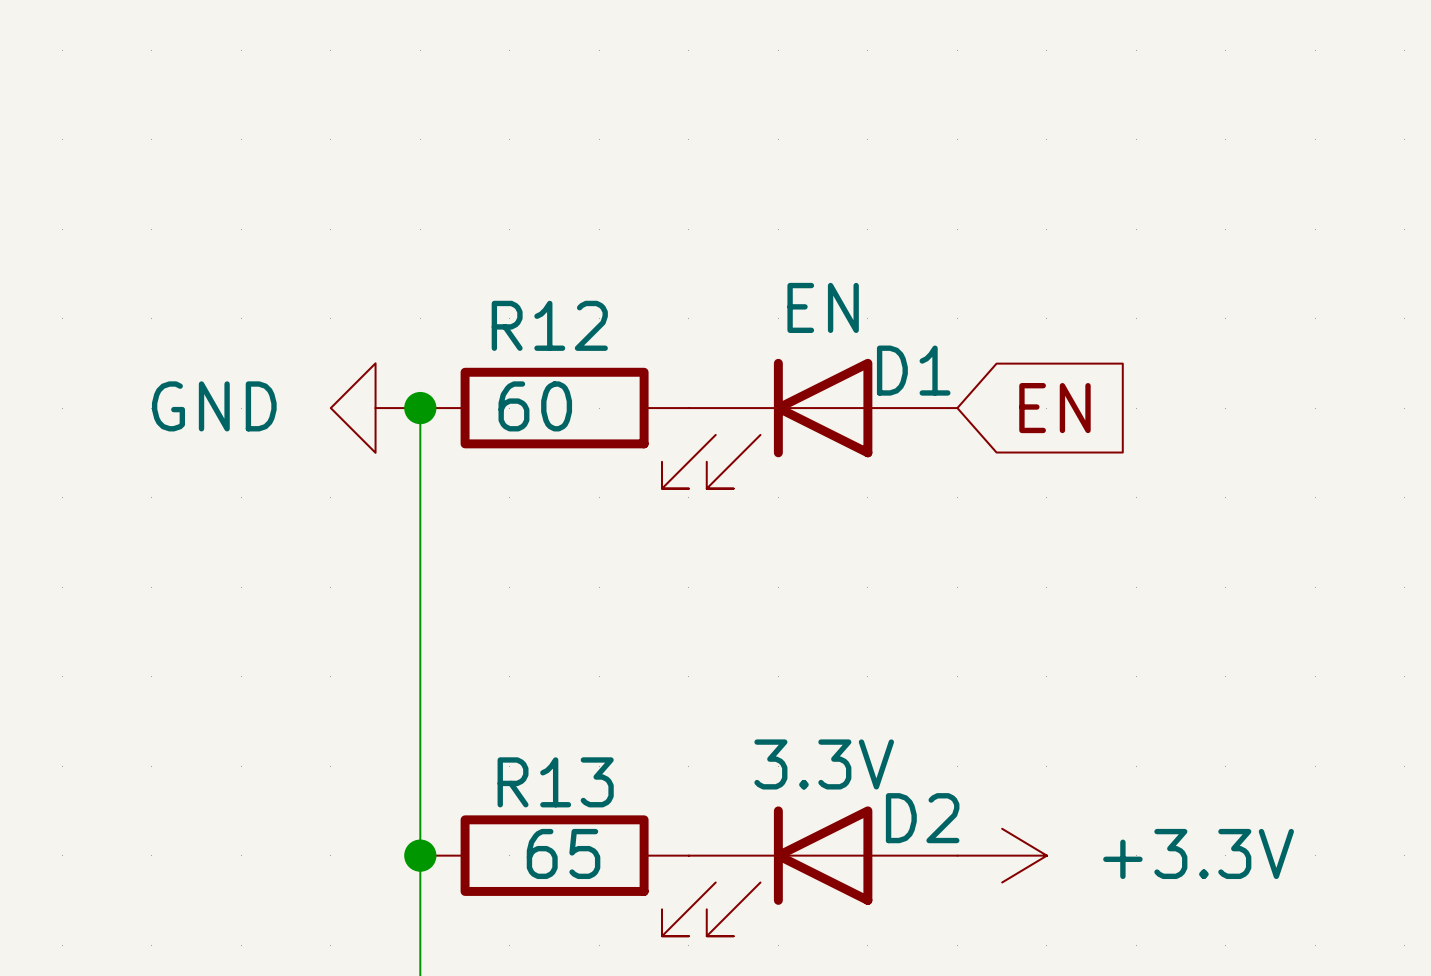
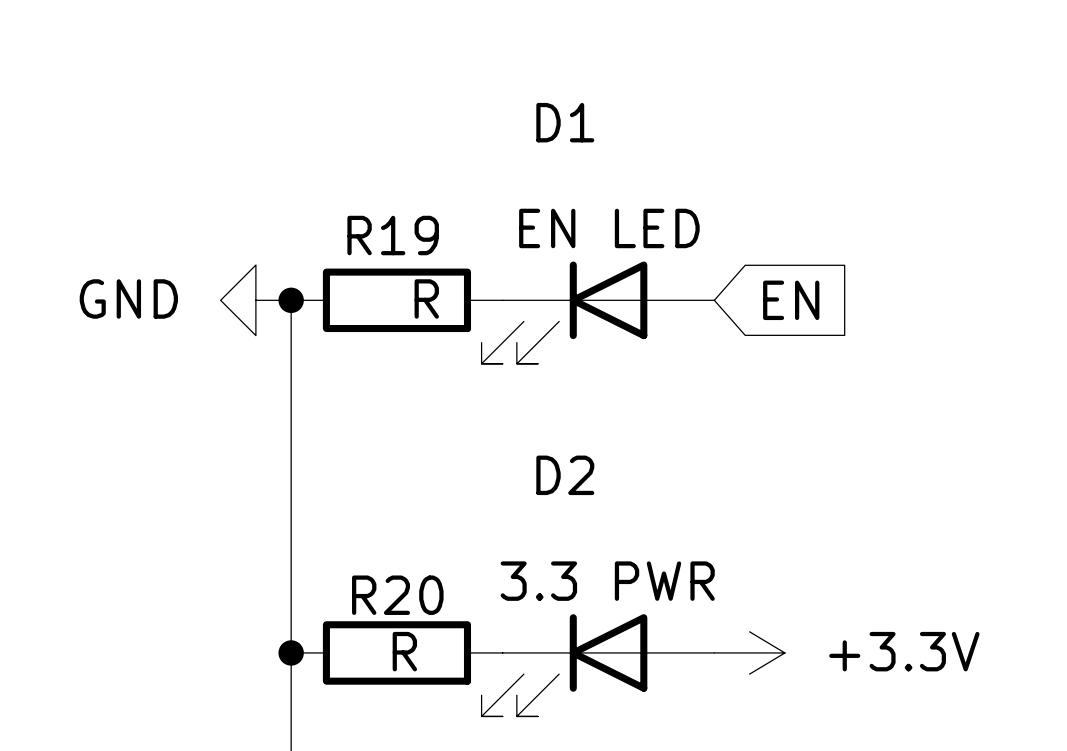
D1 value: EN (823, 307) -> EN LED (609, 228)
R12 name: R12 (549, 325) -> R19 (393, 235)
D1 name position: D1 (913, 370) -> D1 (565, 122)
R12 value: 60 (535, 406) -> R (426, 298)
D2 value: 3.3V (824, 764) -> 3.3 PWR (607, 581)
R13 name: R13 (555, 782) -> R20 (397, 595)
D2 name position: D2 (922, 818) -> D2 (565, 475)
R13 value: 65 (563, 853) -> R (404, 651)

